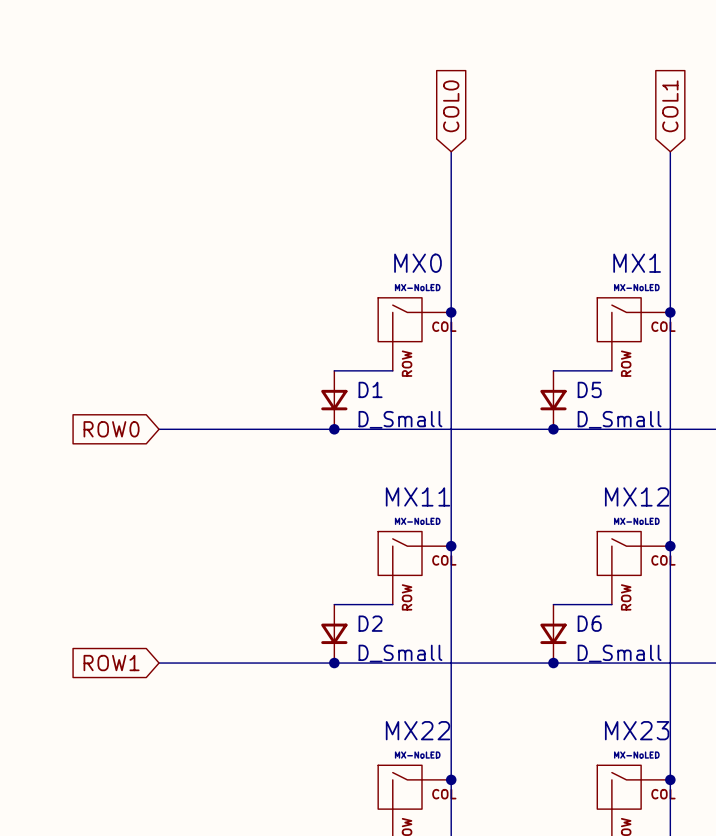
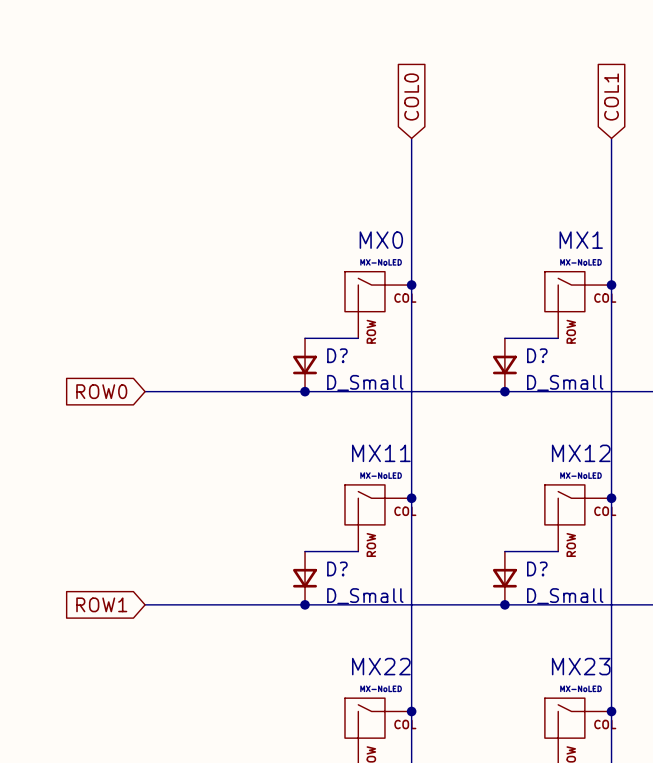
D1 name: D1 (370, 389) -> D? (337, 355)
D5 name: D5 (589, 389) -> D? (537, 355)
D2 name: D2 (370, 623) -> D? (337, 568)
D6 name: D6 (589, 623) -> D? (537, 568)

